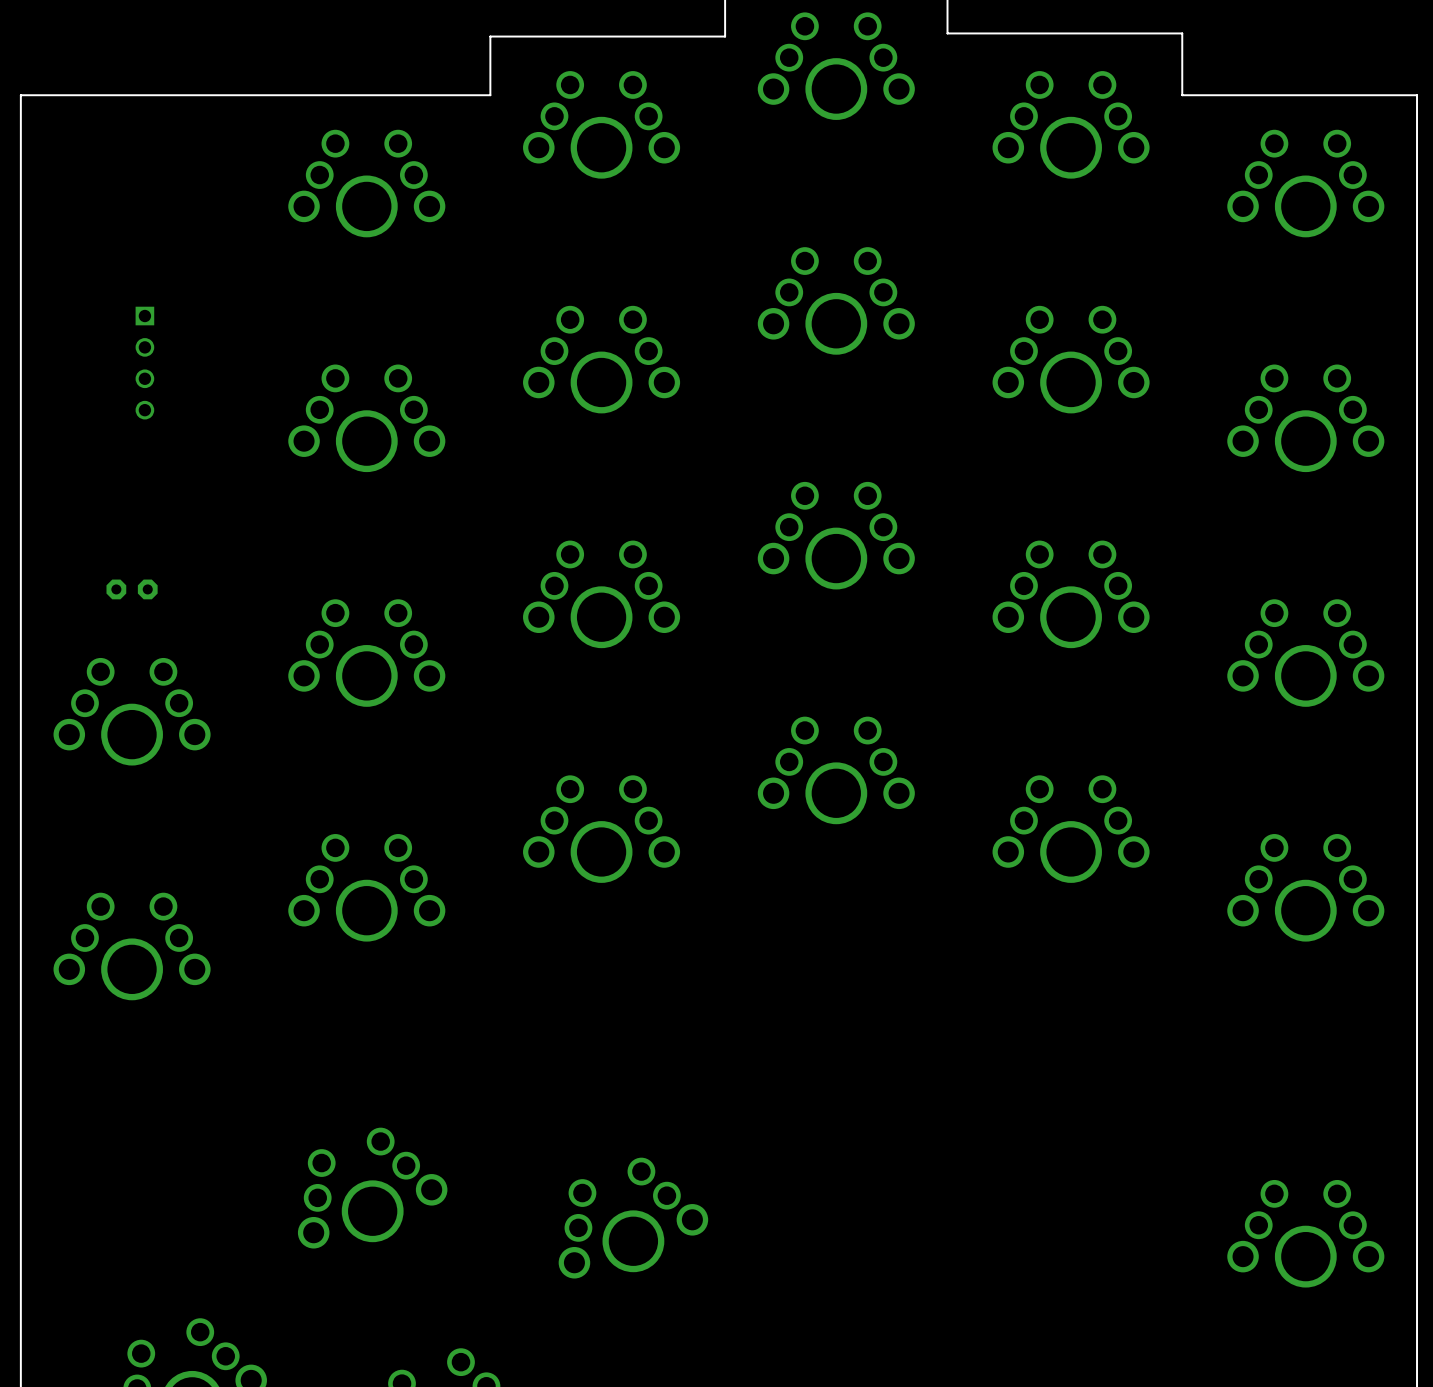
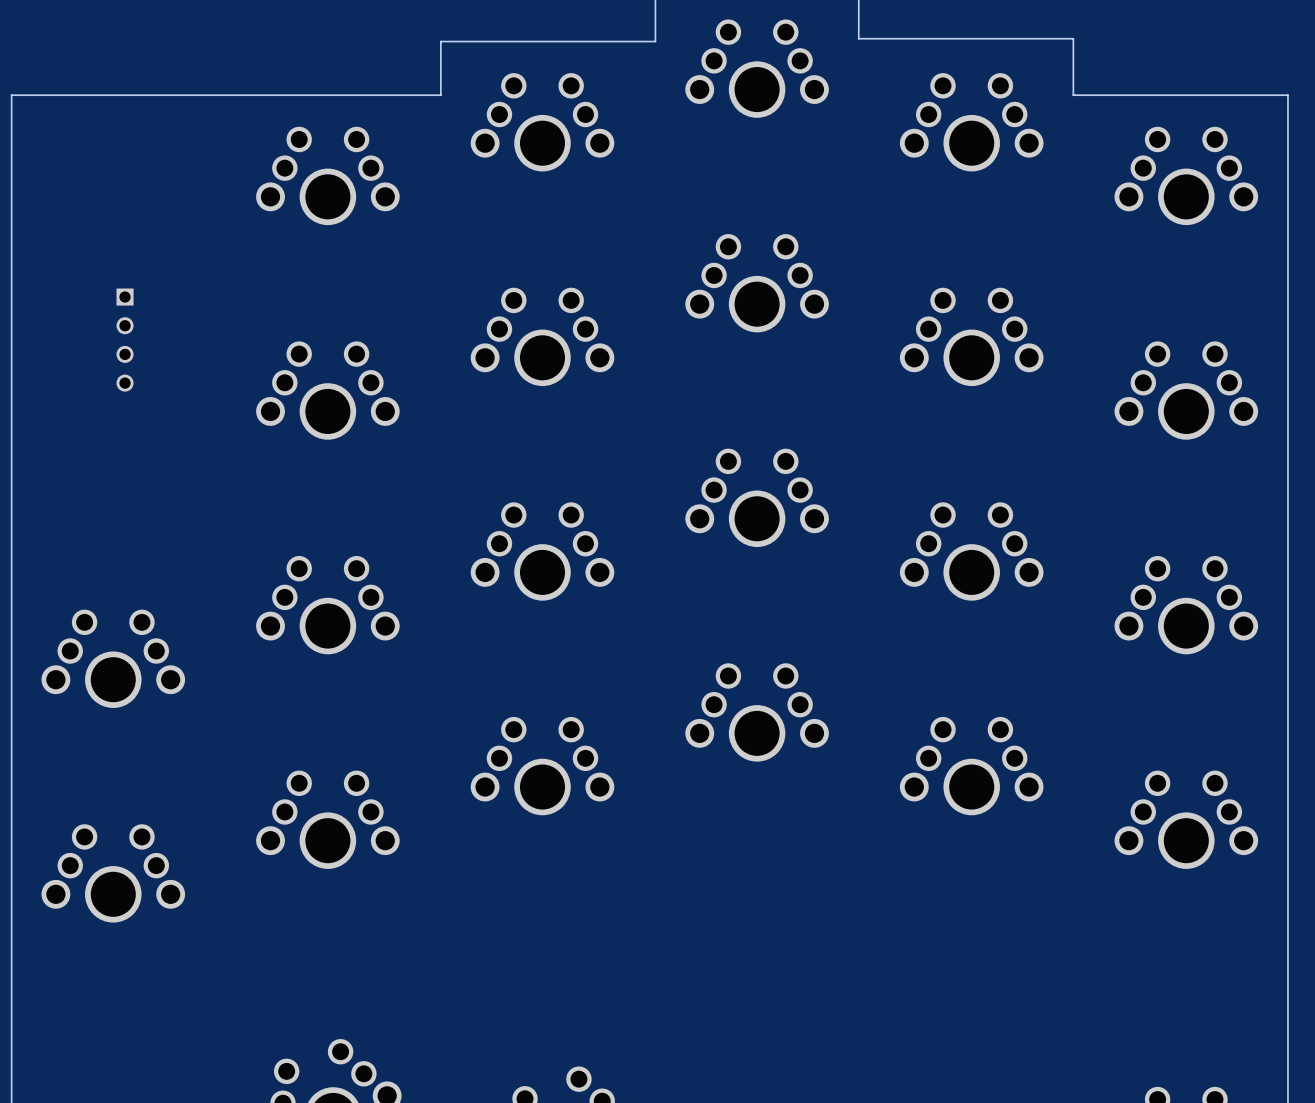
part: (132, 589) -> none

